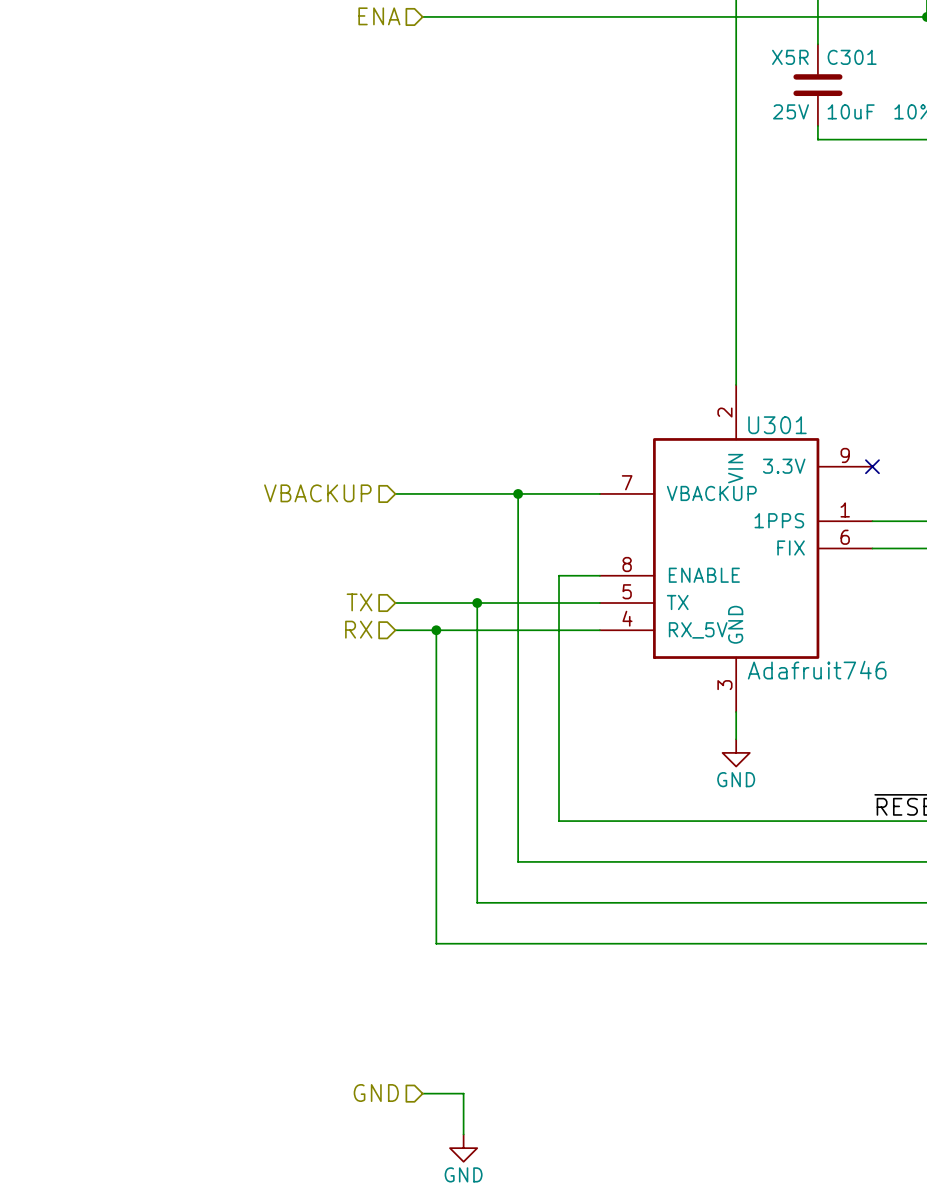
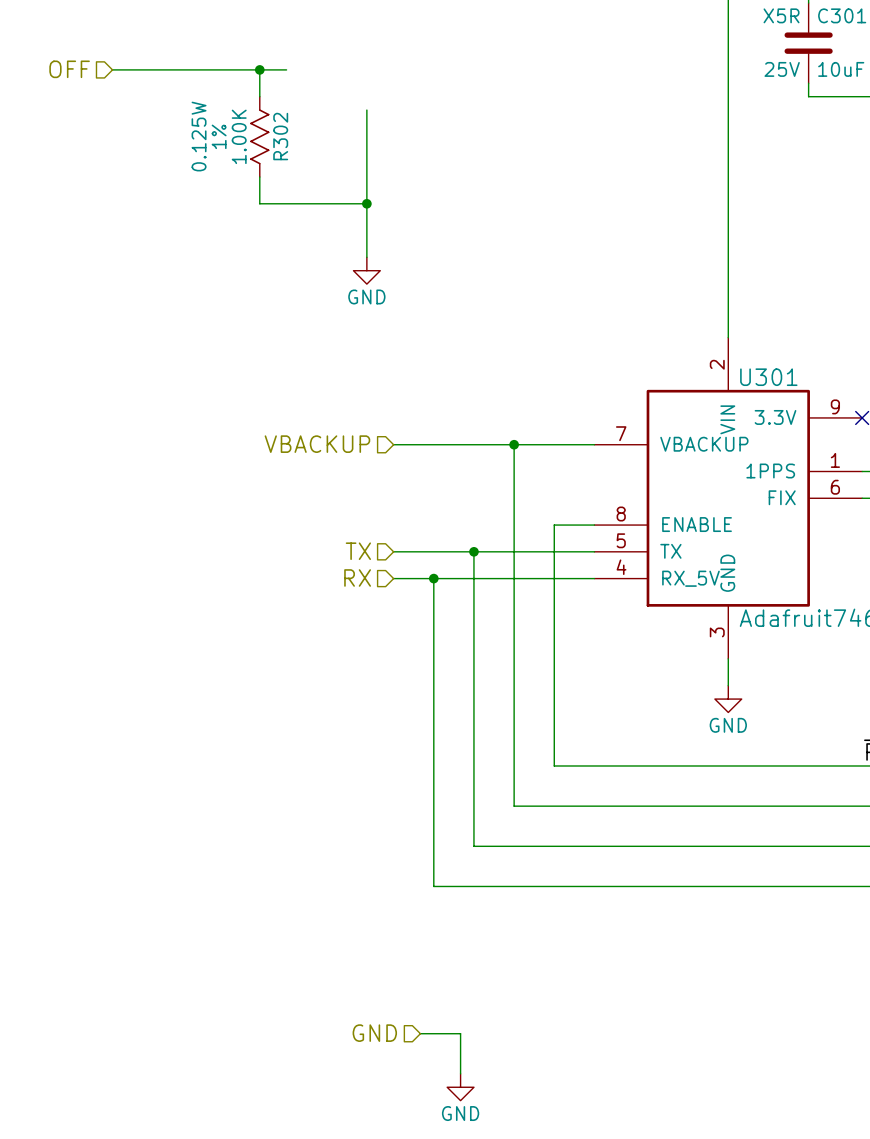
hierarchical label: none -> OFF (69, 69)
wire: none -> (112, 69) (286, 69)
wire: none -> (259, 69) (259, 96)
junction: none -> (259, 69)
wire: none -> (366, 110) (366, 257)
R302: none -> 1.00K (259, 136)
wire: none -> (259, 177) (259, 203) (366, 203)
junction: none -> (366, 203)
power symbol: none -> GND (366, 270)

